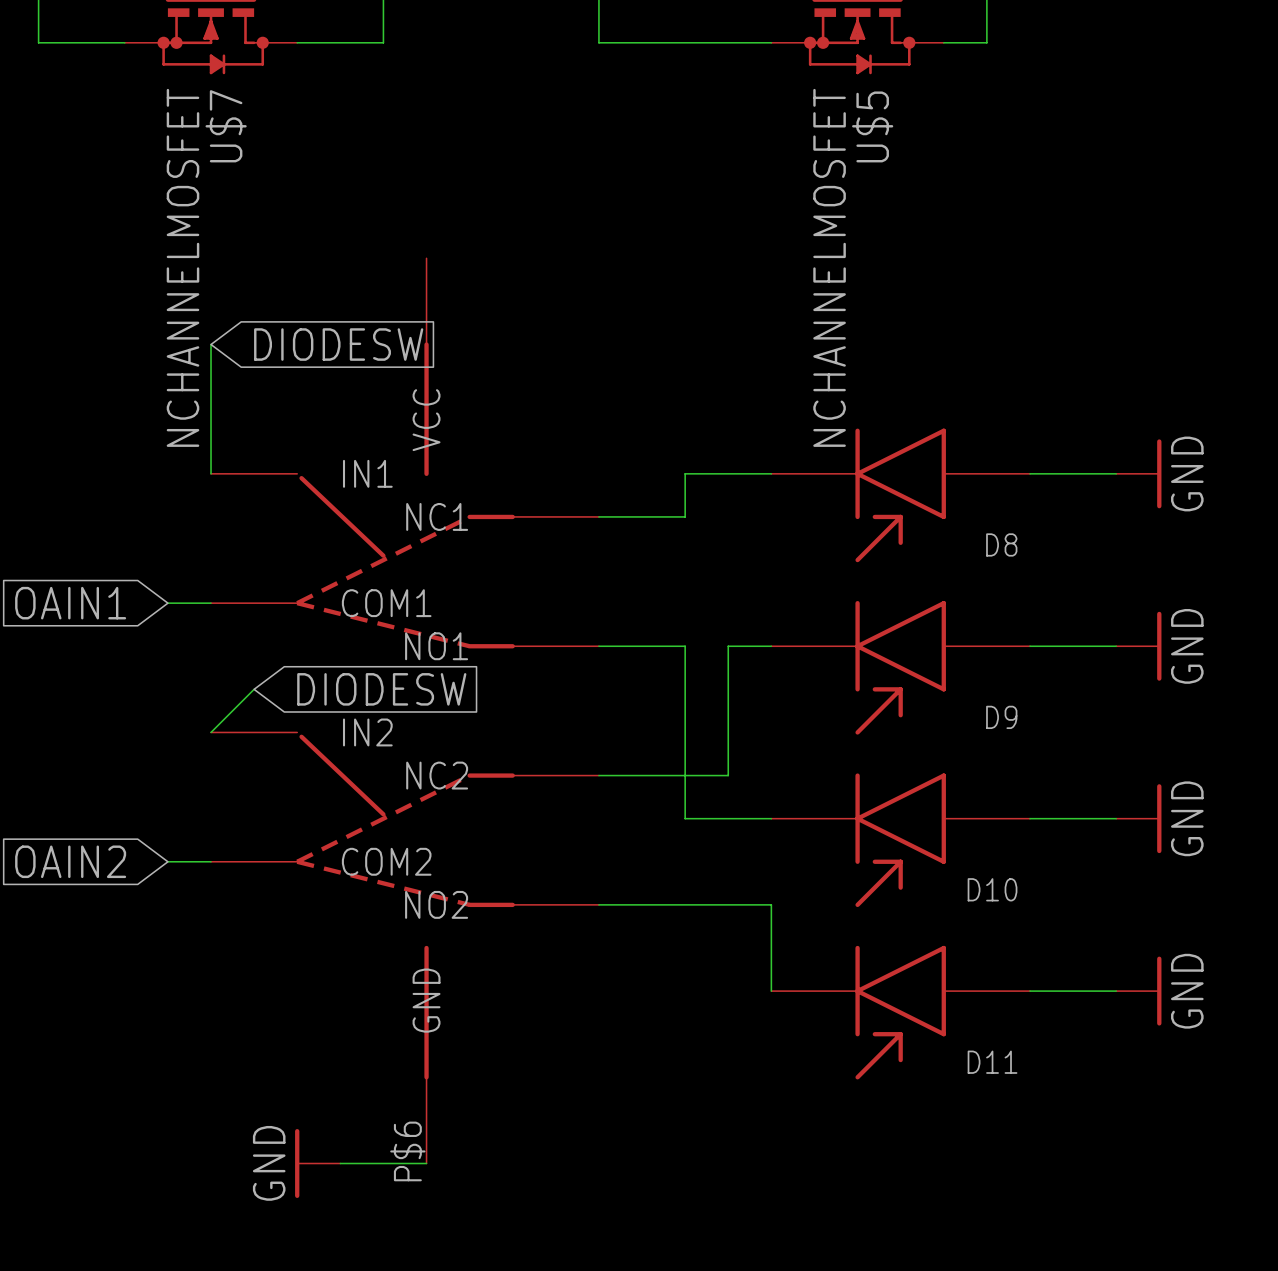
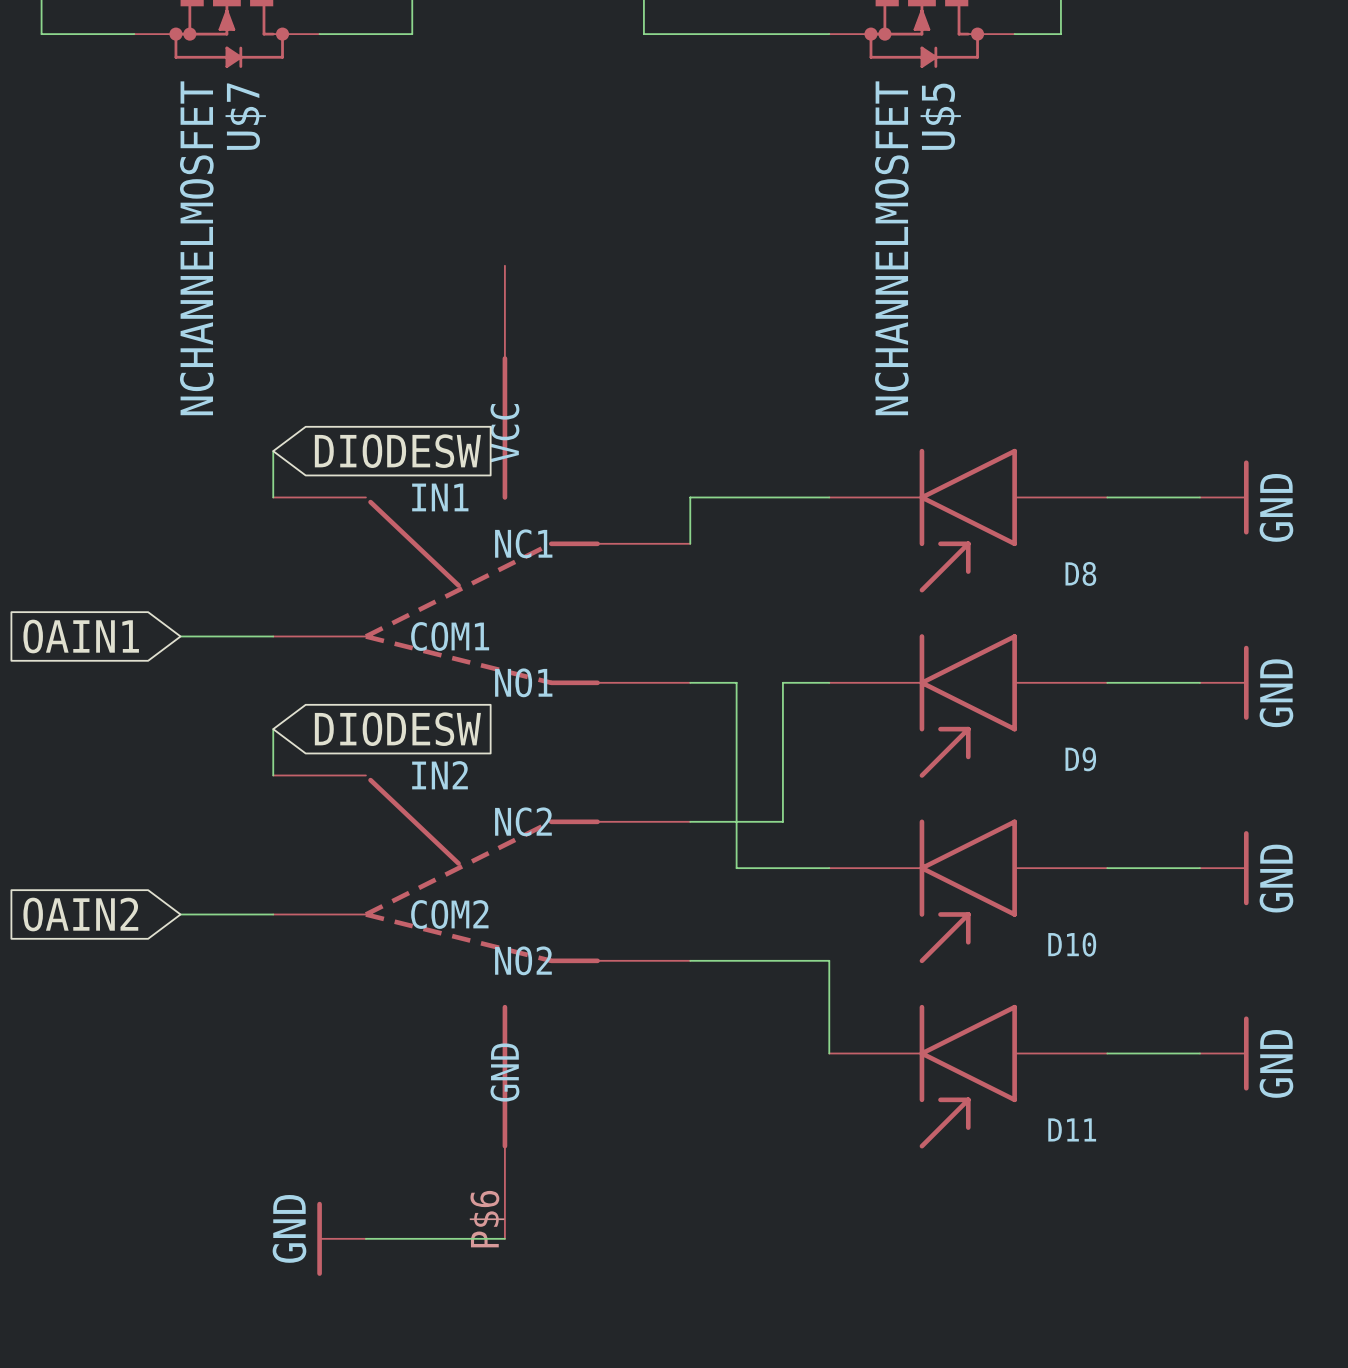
wire: (211, 344) (211, 473) -> none
global label position: DIODESW (338, 344) -> DIODESW (397, 451)
wire: none -> (273, 451) (273, 497)
wire: (685, 473) (685, 516) (598, 516) -> (736, 497) (690, 497) (690, 543)
wire: (254, 689) (211, 732) -> (273, 729) (273, 775)
part position: (404, 710) -> (481, 752)
wire: none -> (458, 1238) (504, 1238)

